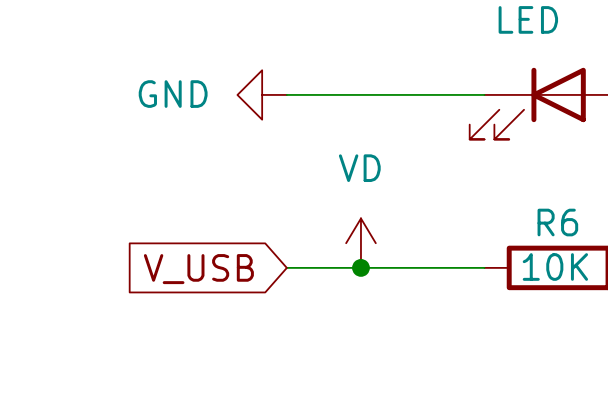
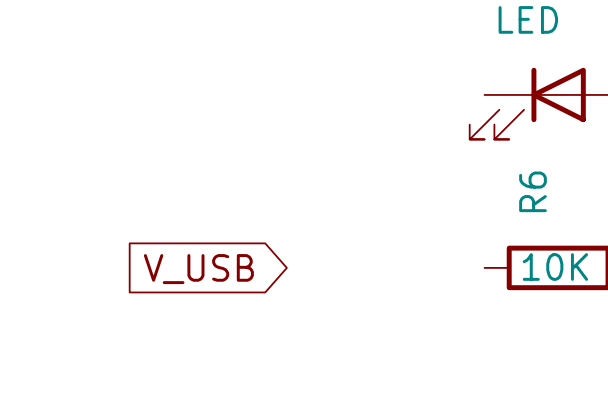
power symbol: GND (262, 94) -> none
wire: (286, 94) (484, 94) -> none
R6 name rotation: 0° (557, 222) -> 90° counterclockwise (532, 191)
power symbol: VD (360, 243) -> none
wire: (286, 267) (484, 267) -> none
junction: (360, 267) -> none

